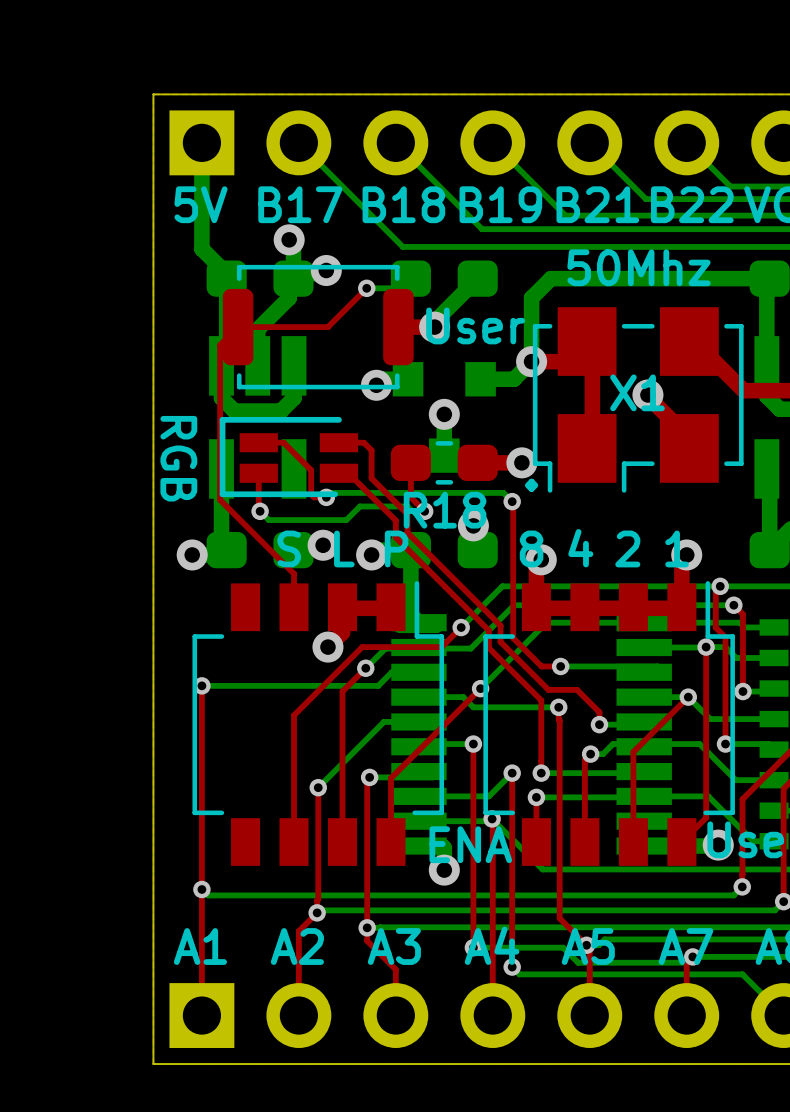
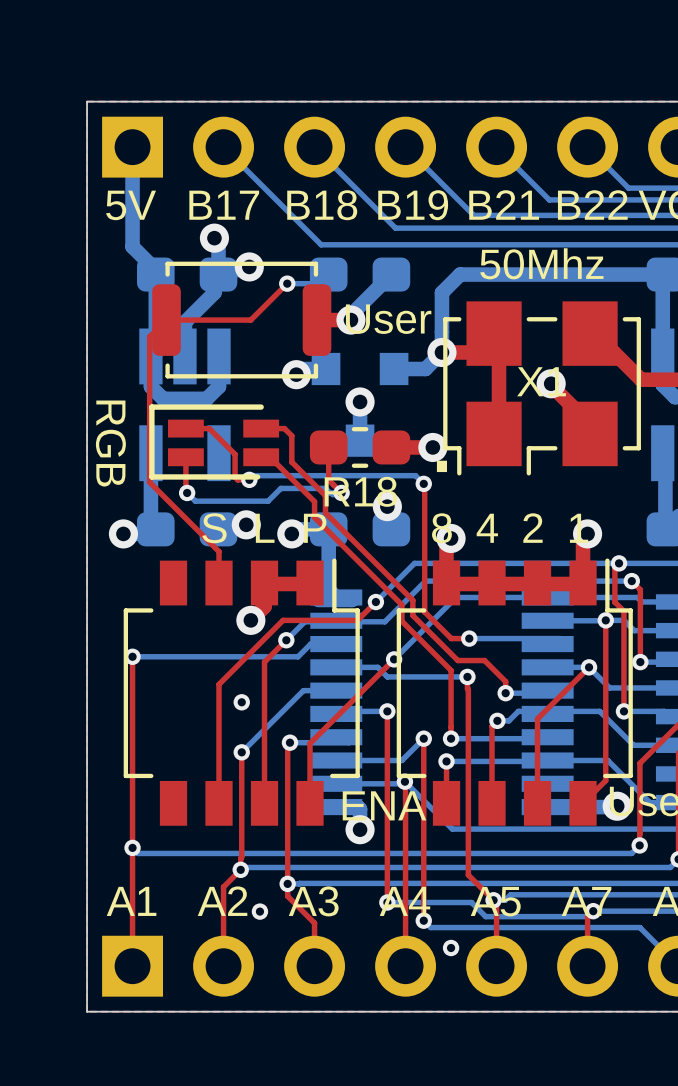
via: none -> (241, 702)
via: none -> (259, 911)
via: none -> (451, 948)

